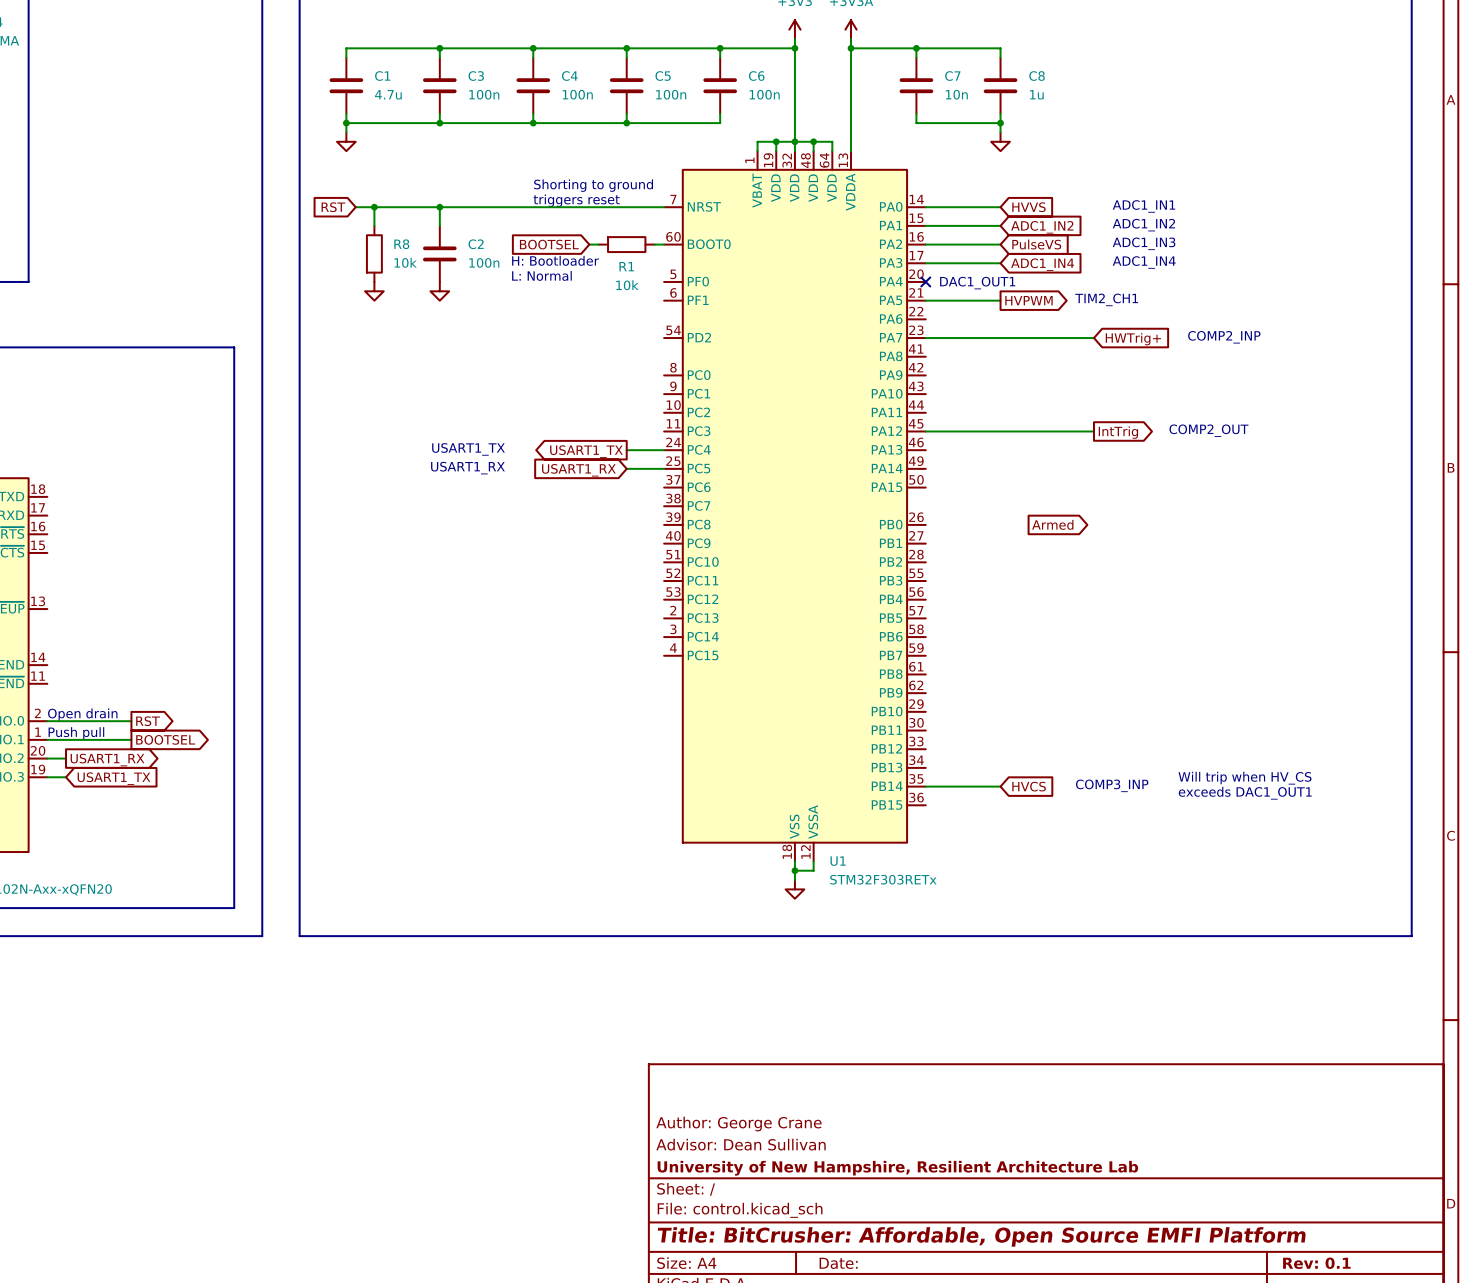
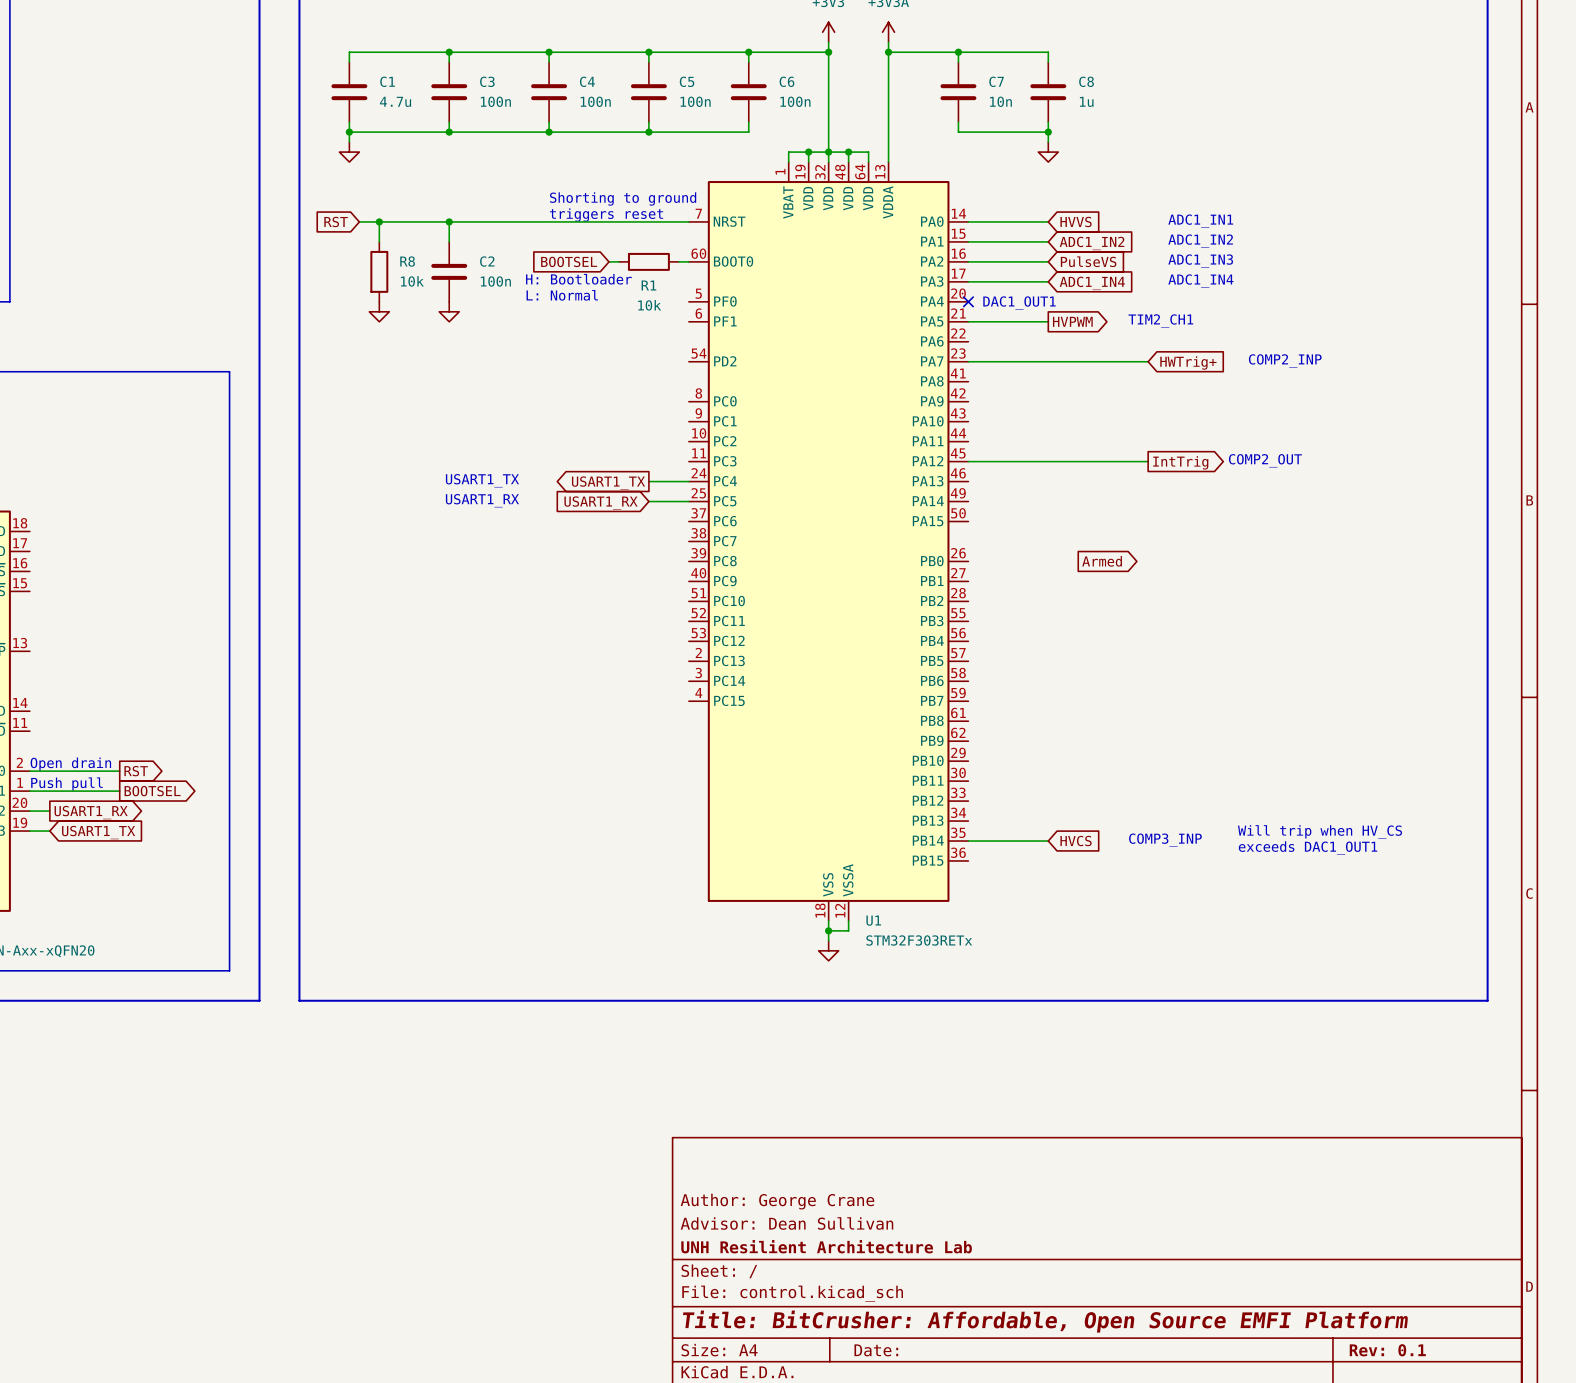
title block: University of New Hampshire, Resilient Architecture Lab (897, 1168) -> UNH Resilient Architecture Lab (826, 1246)

